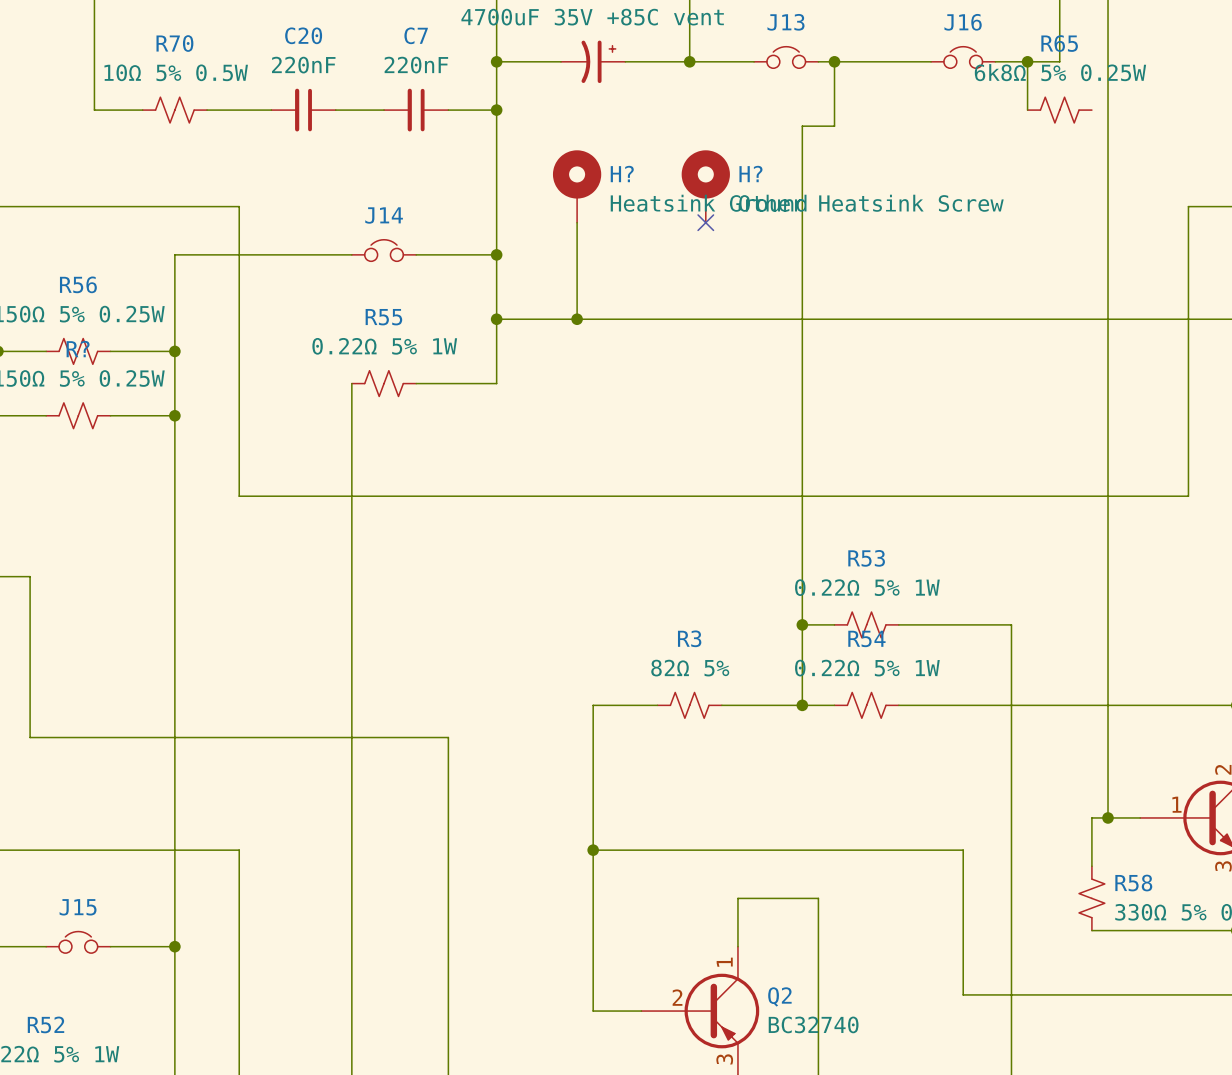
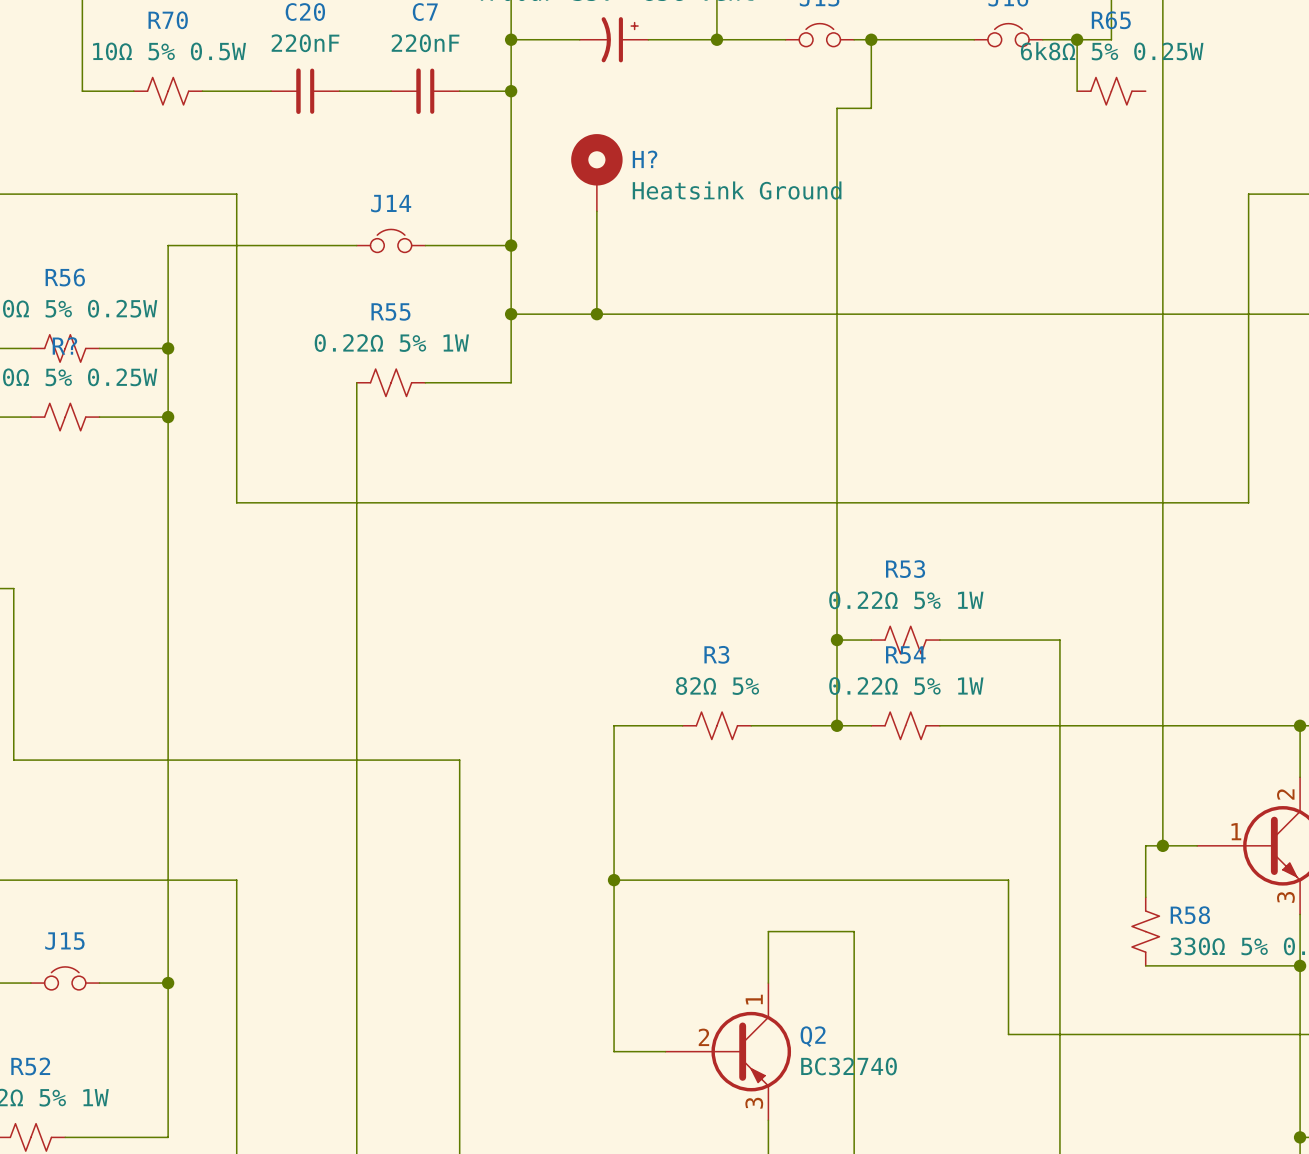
H?: Other Heatsink Screw (705, 186) -> none
no-connect mark: (705, 222) -> none

